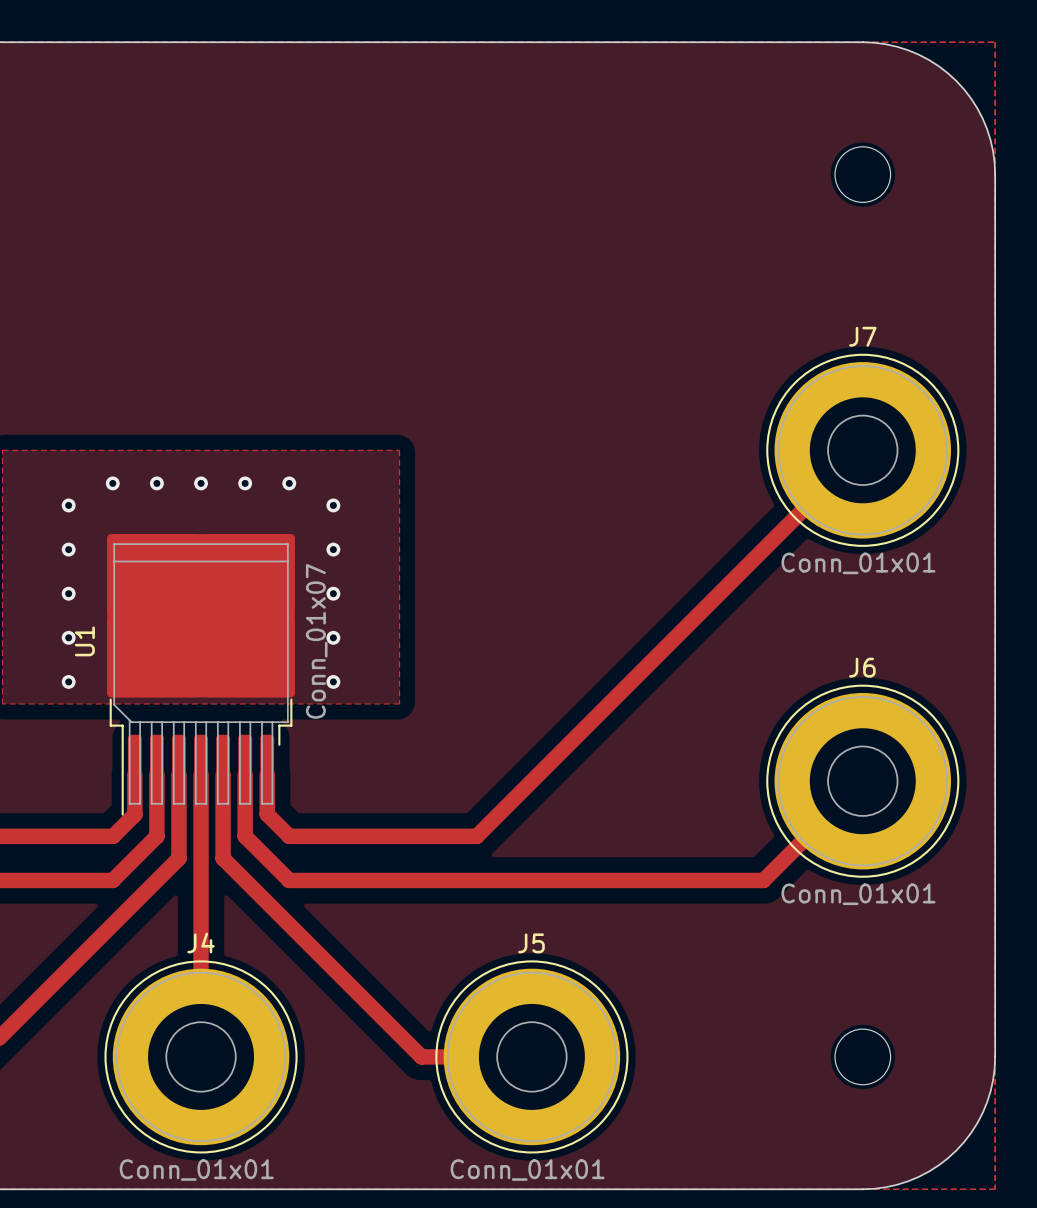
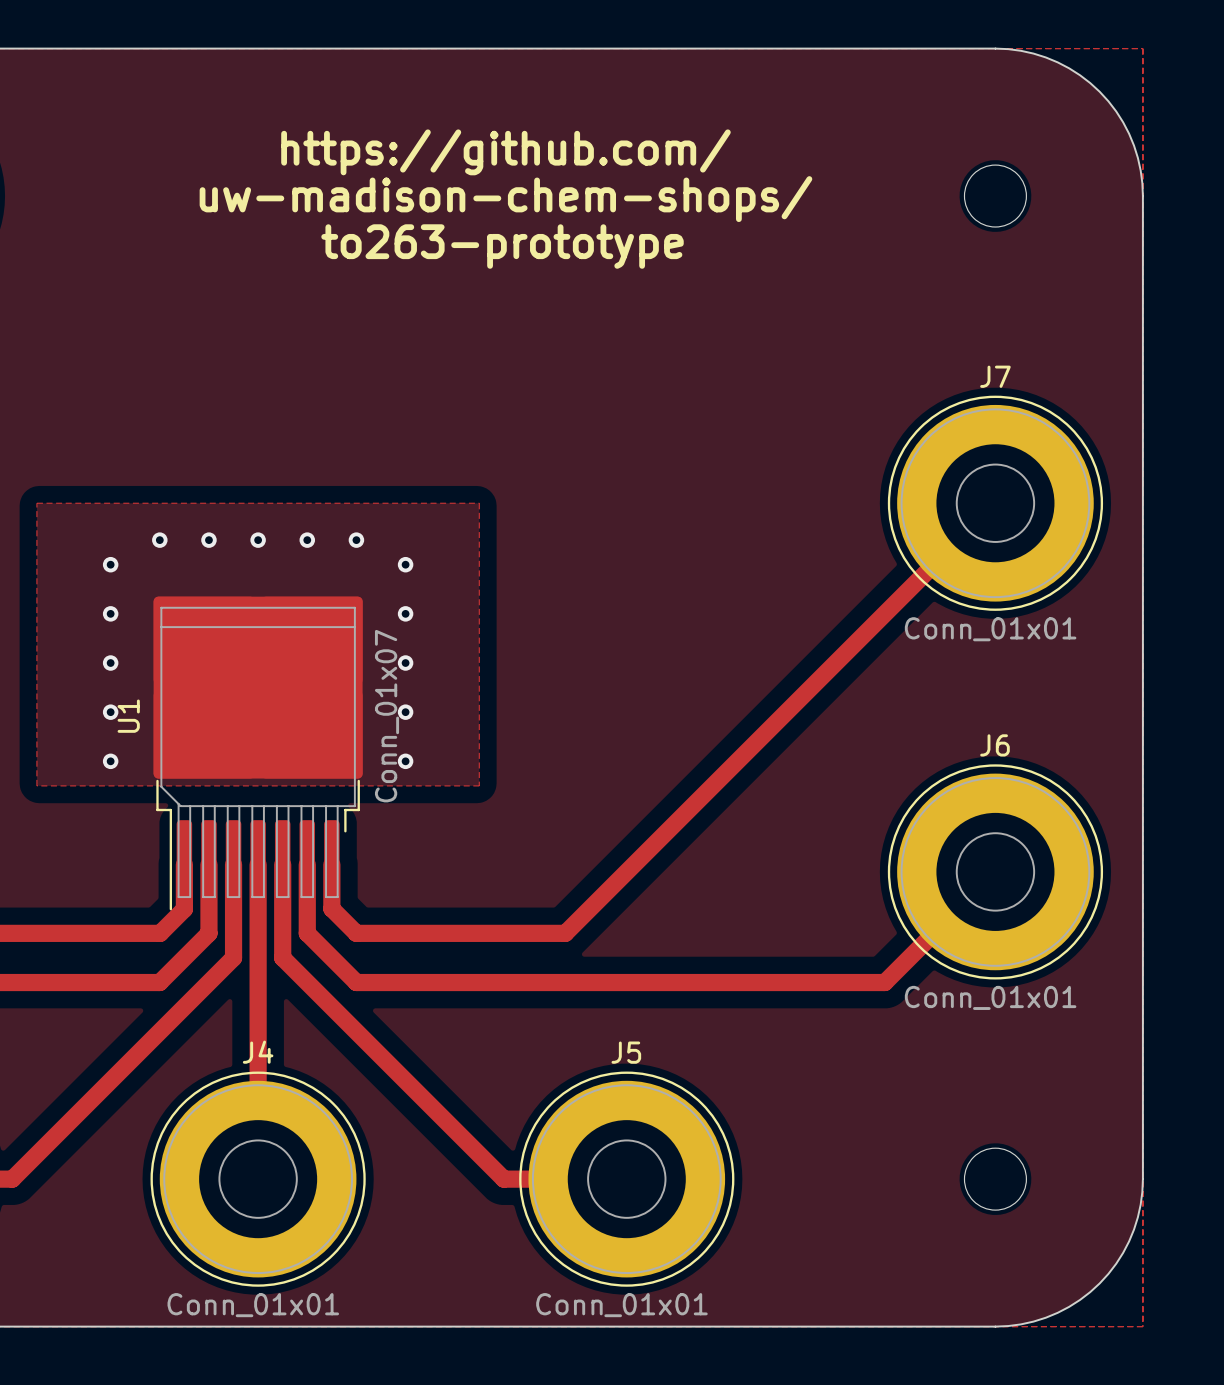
text: none -> https://github.com/ (505, 152)
text: none -> uw-madison-chem-shops/ (505, 199)
text: none -> to263-prototype (502, 246)

